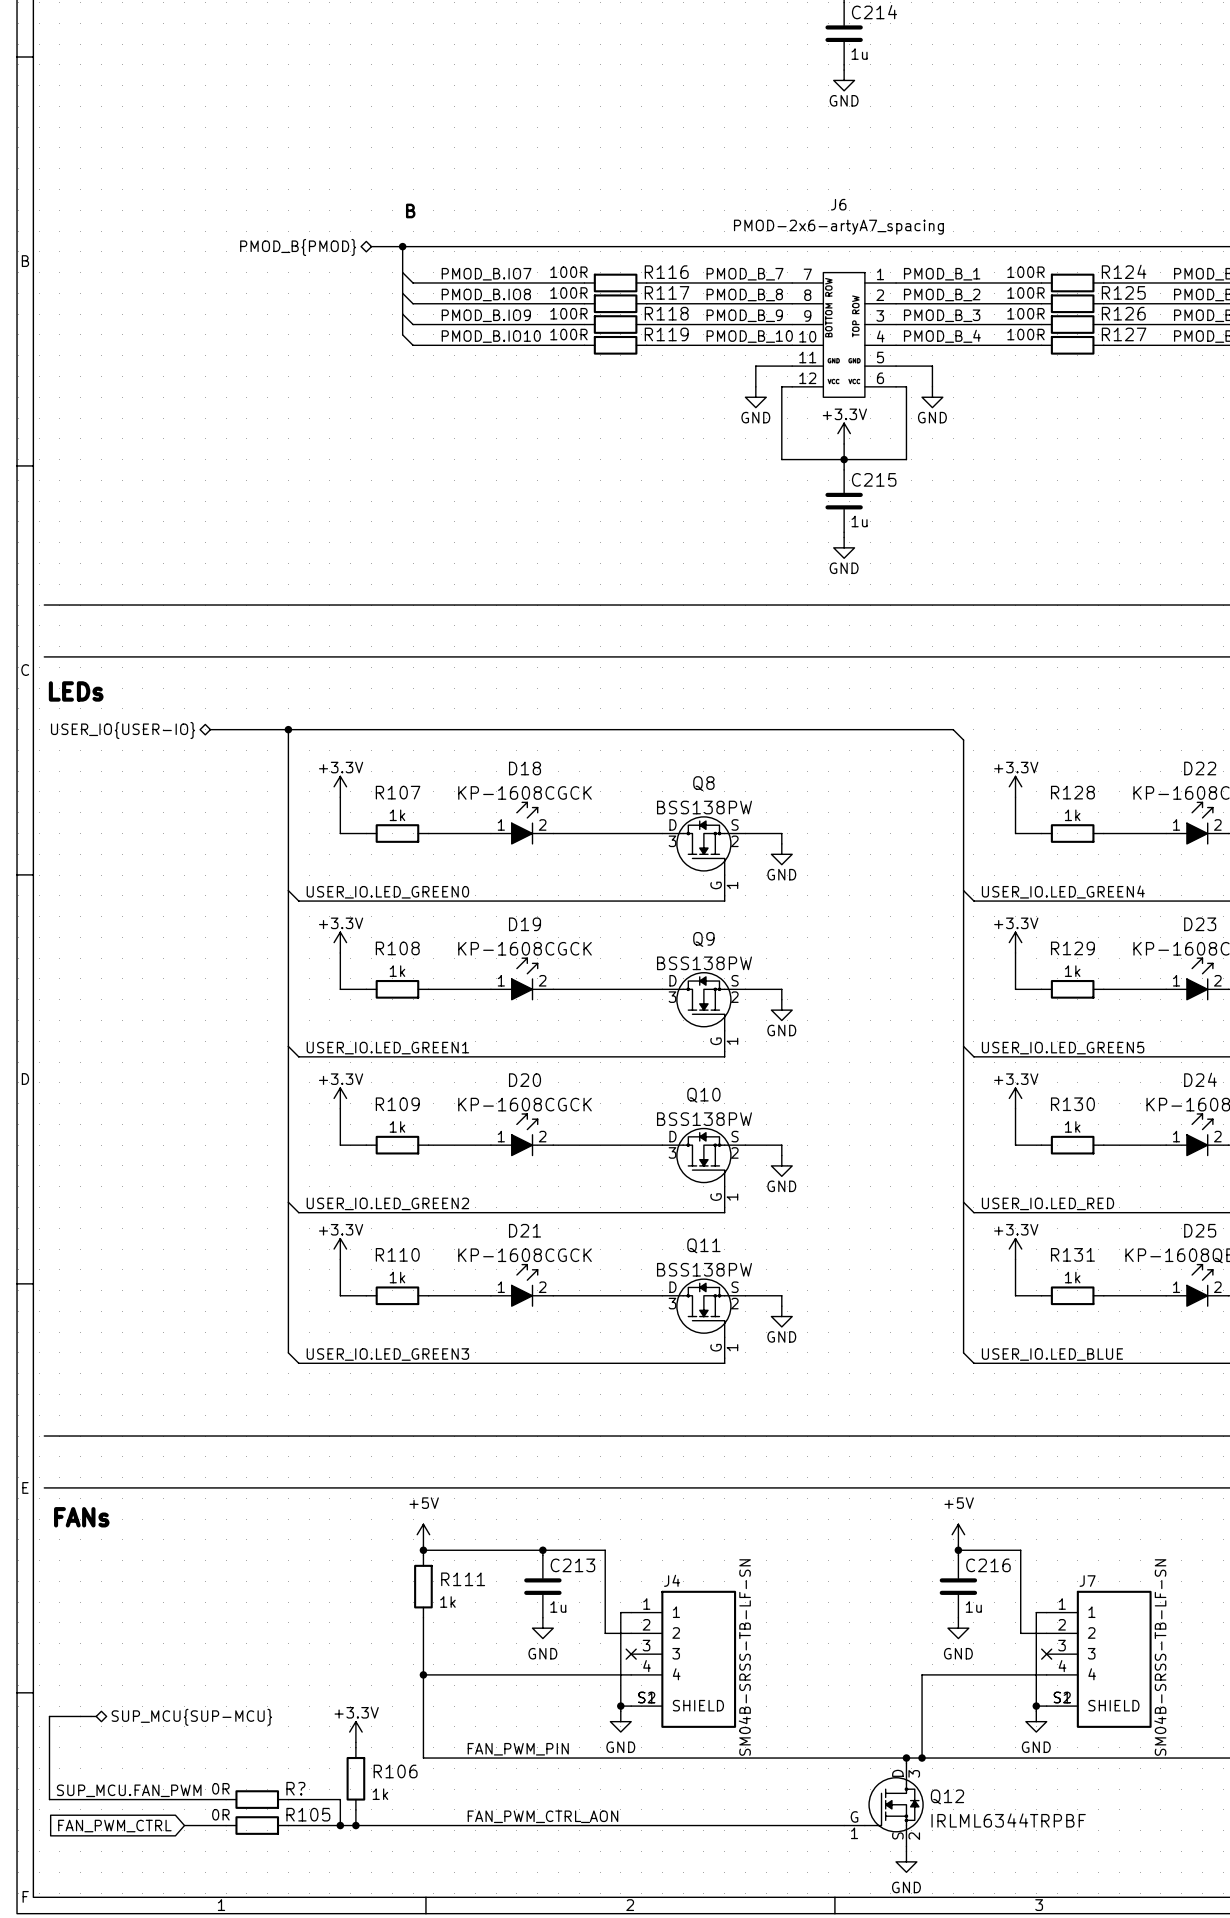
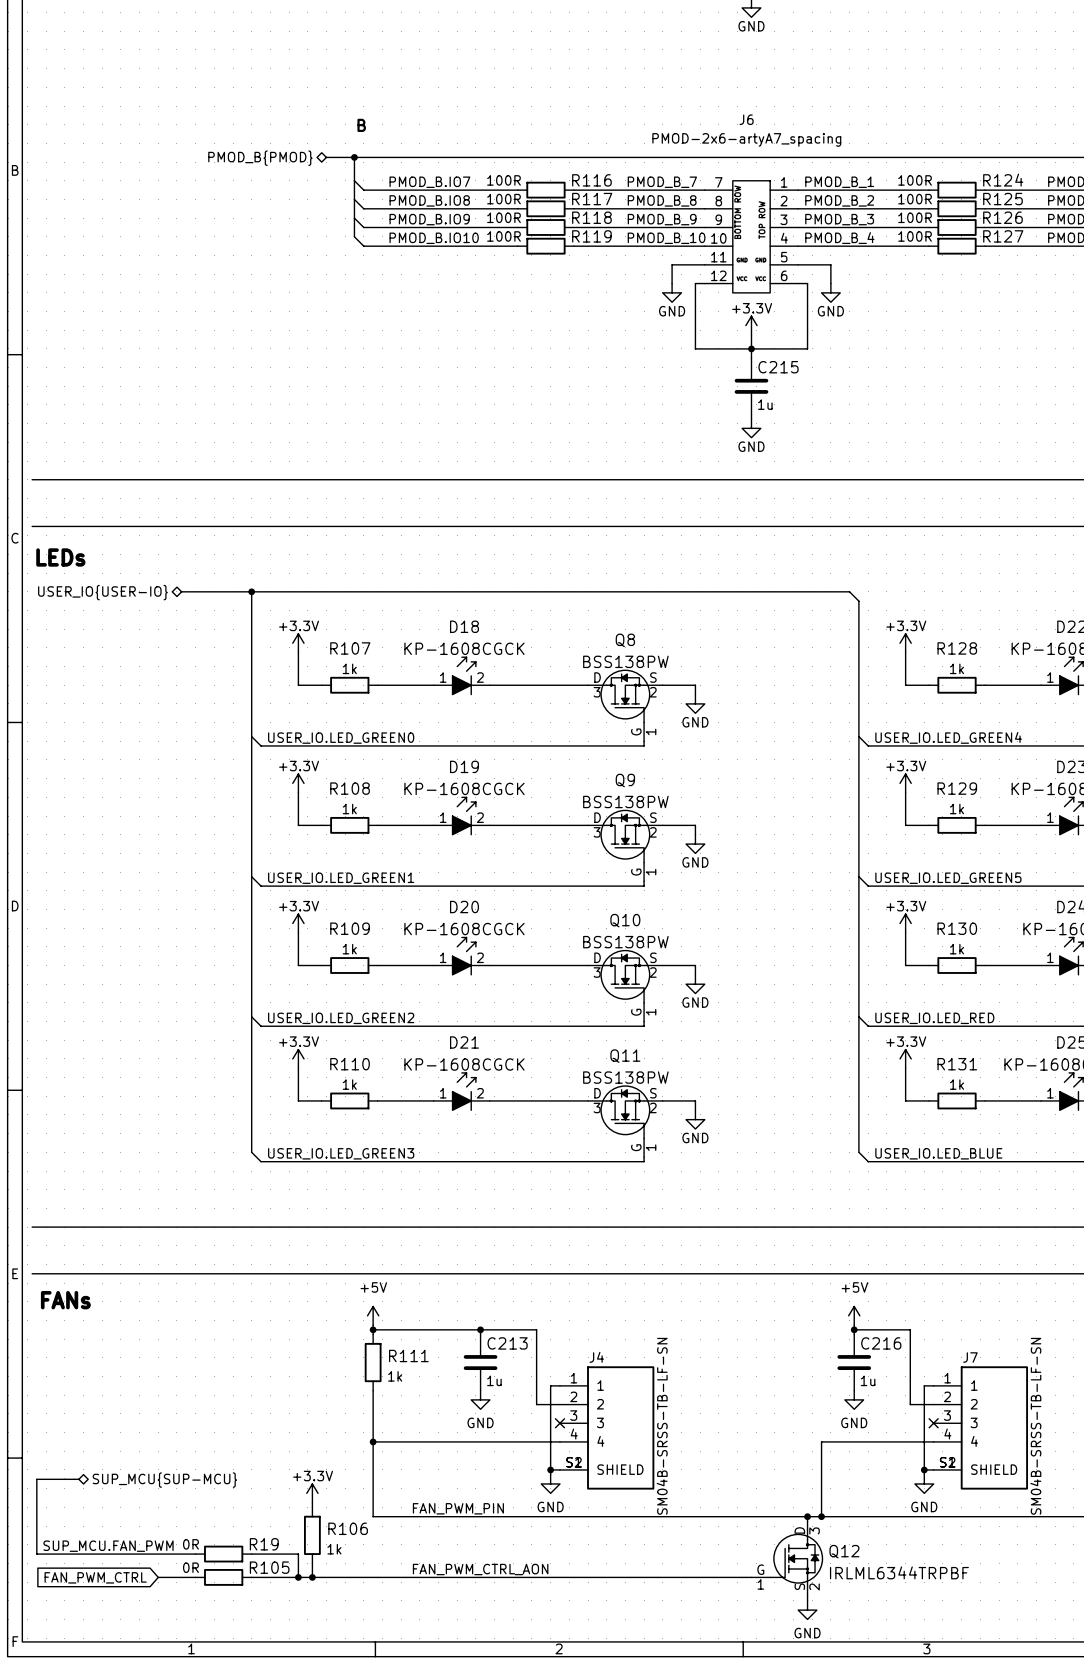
R? name: R? (295, 1788) -> R19 (264, 1544)

